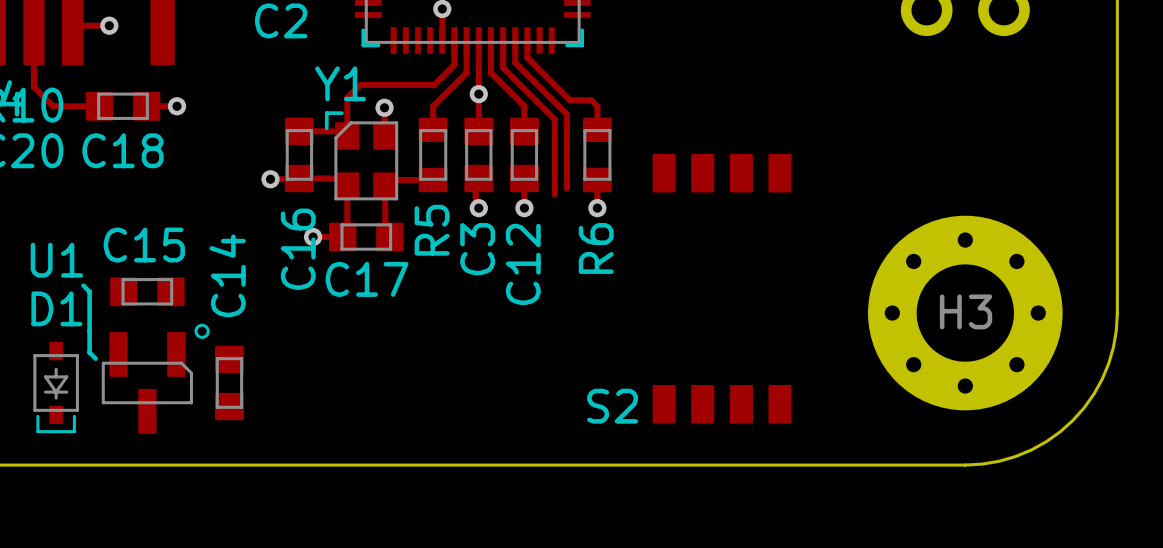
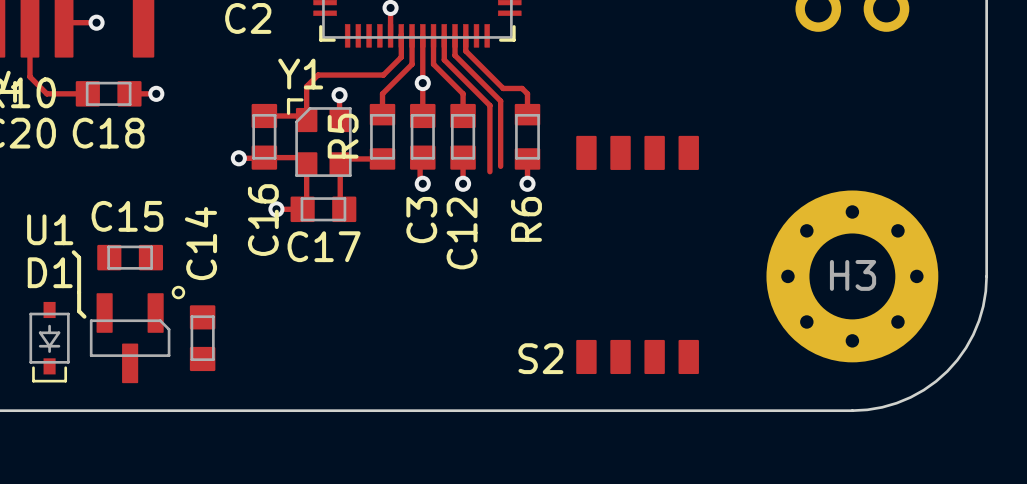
R5 name position: R5 (432, 230) -> R5 (343, 136)

